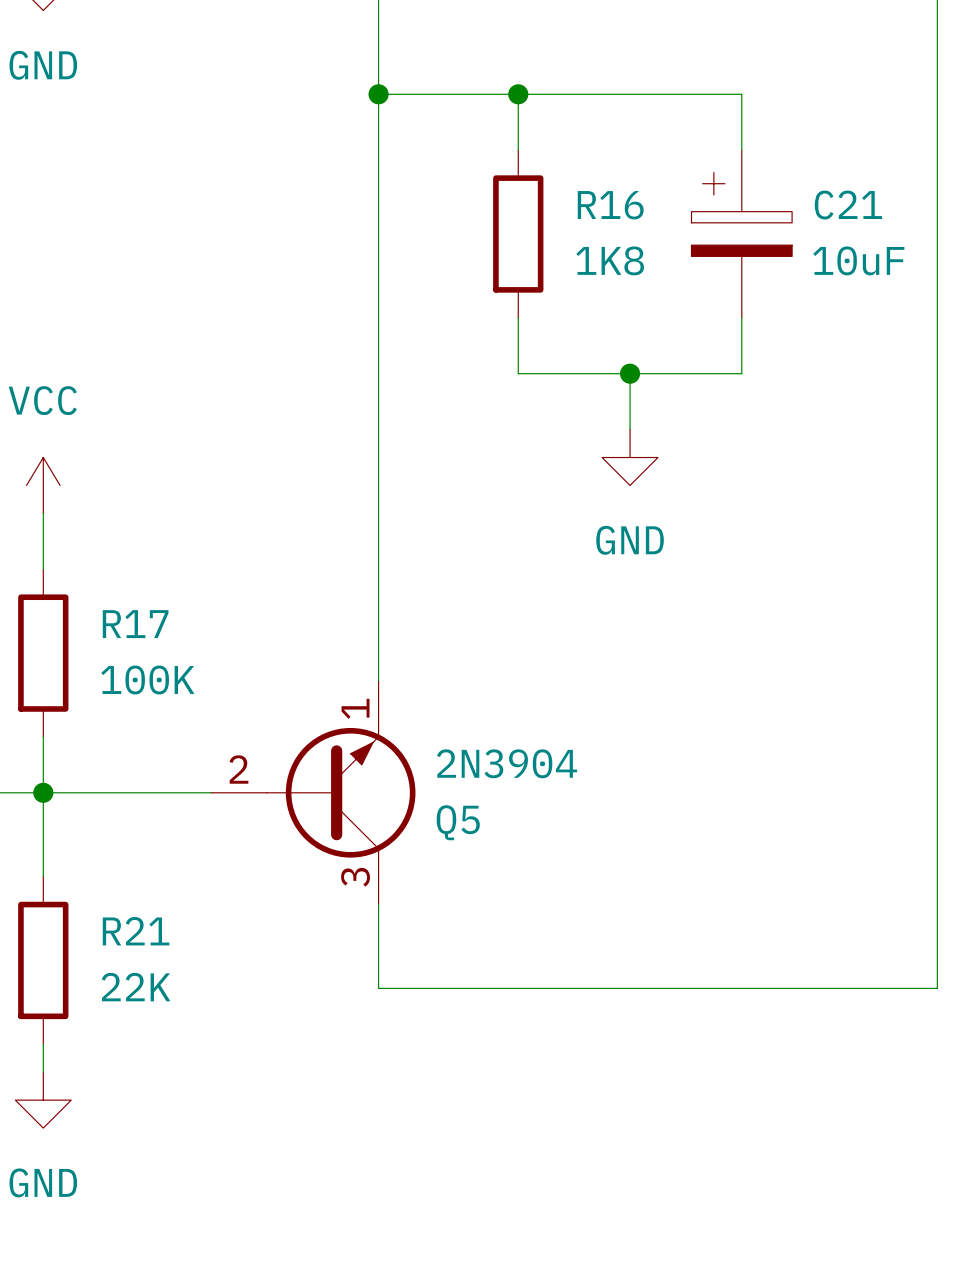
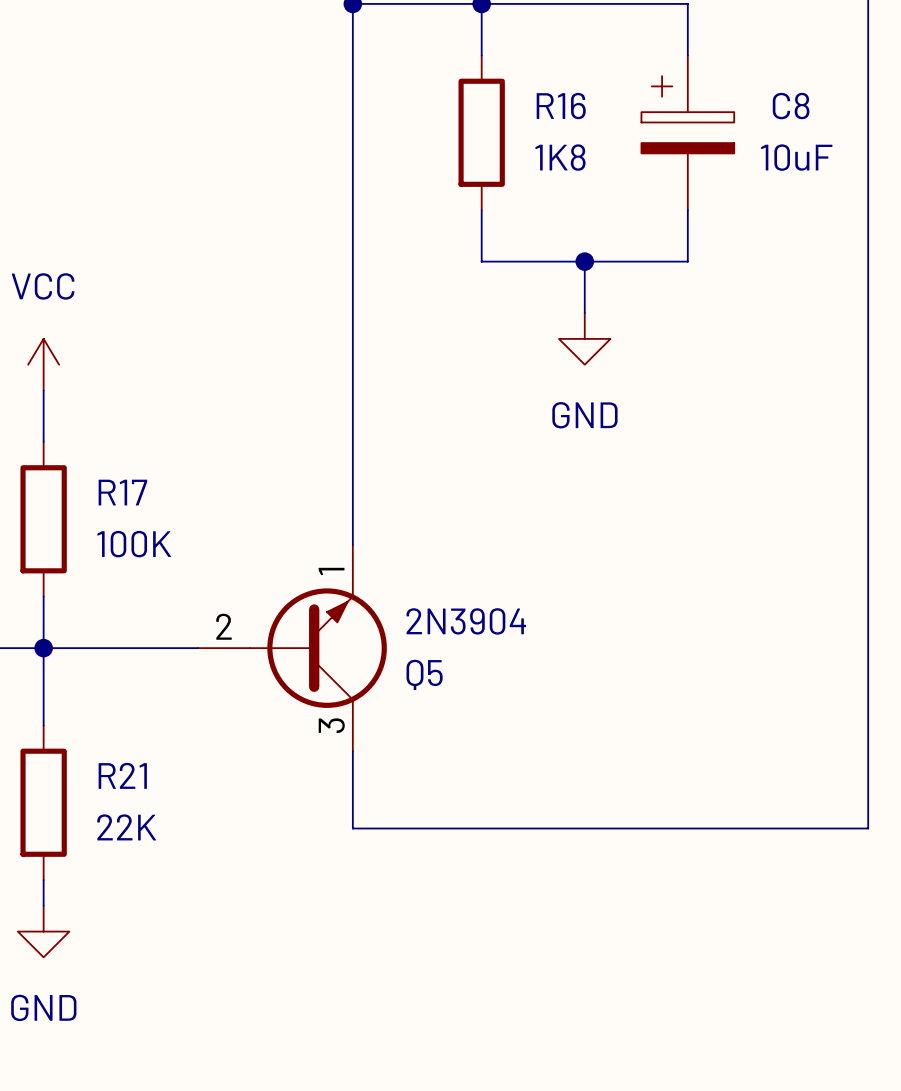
C21 name: C21 (848, 205) -> C8 (791, 106)

